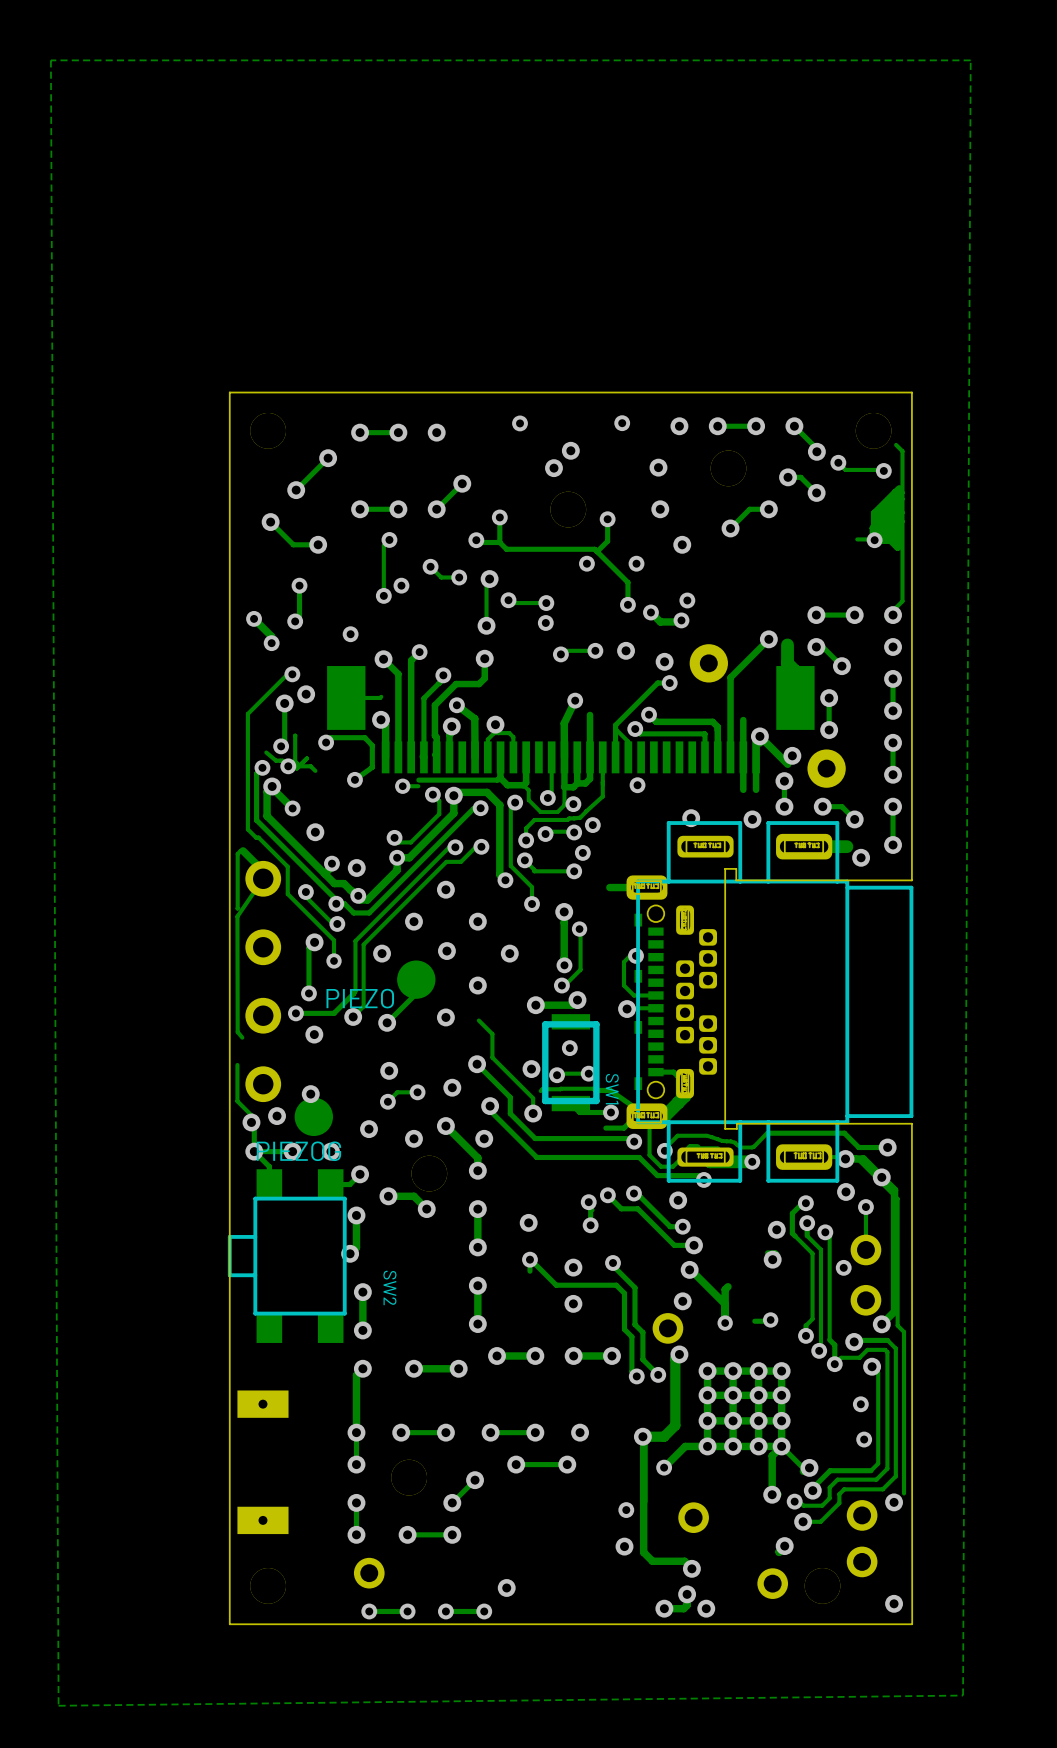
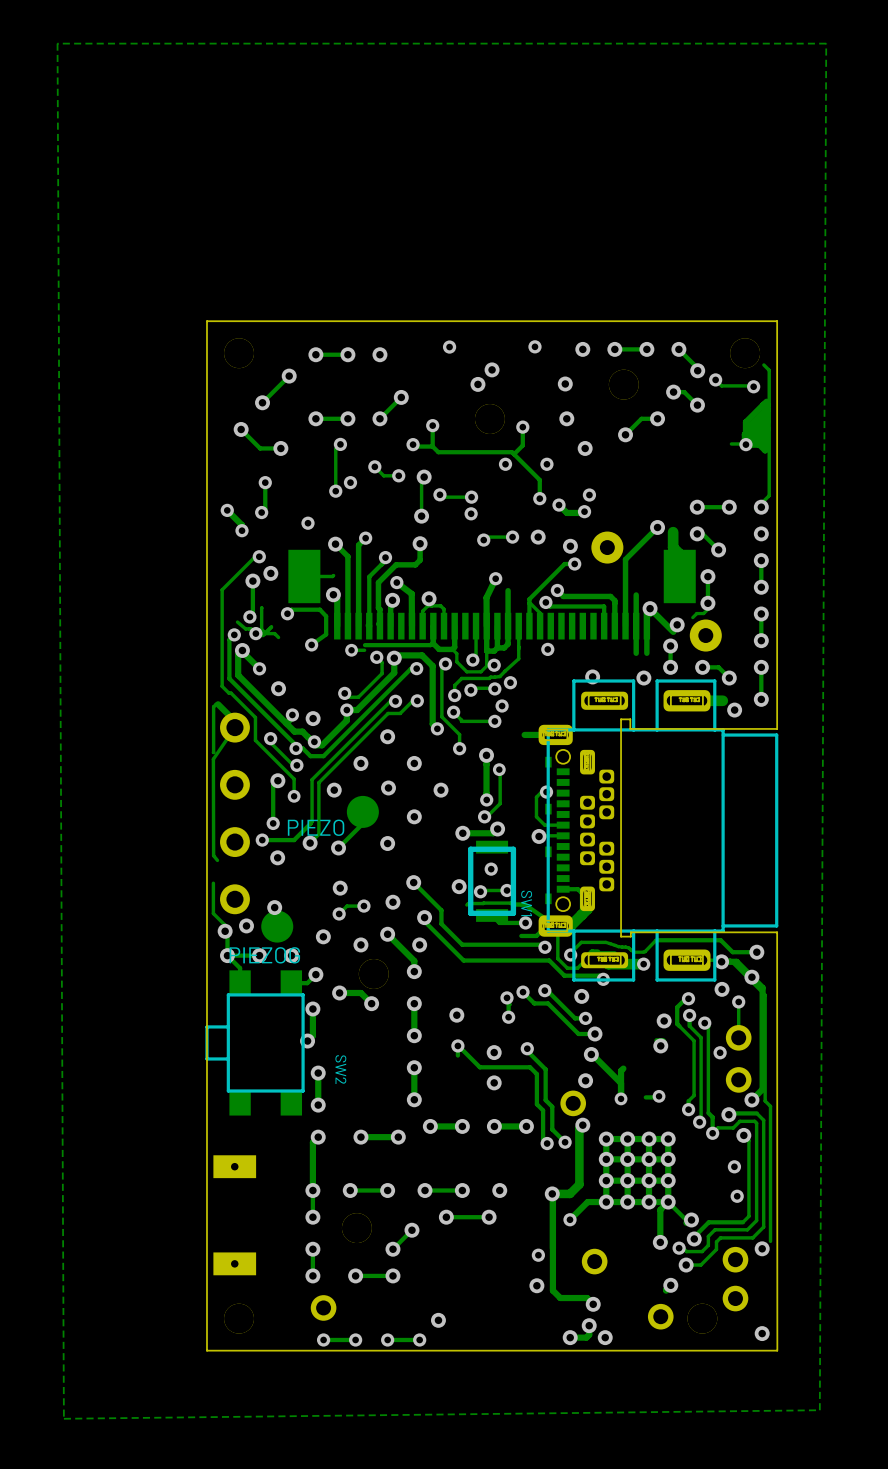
track: none -> (707, 603) (707, 609) (703, 613) (696, 613) (692, 617)
track: (478, 1020) (492, 1034) (492, 1057) (533, 1098) (533, 1113) -> none
via: (533, 1113) -> none

